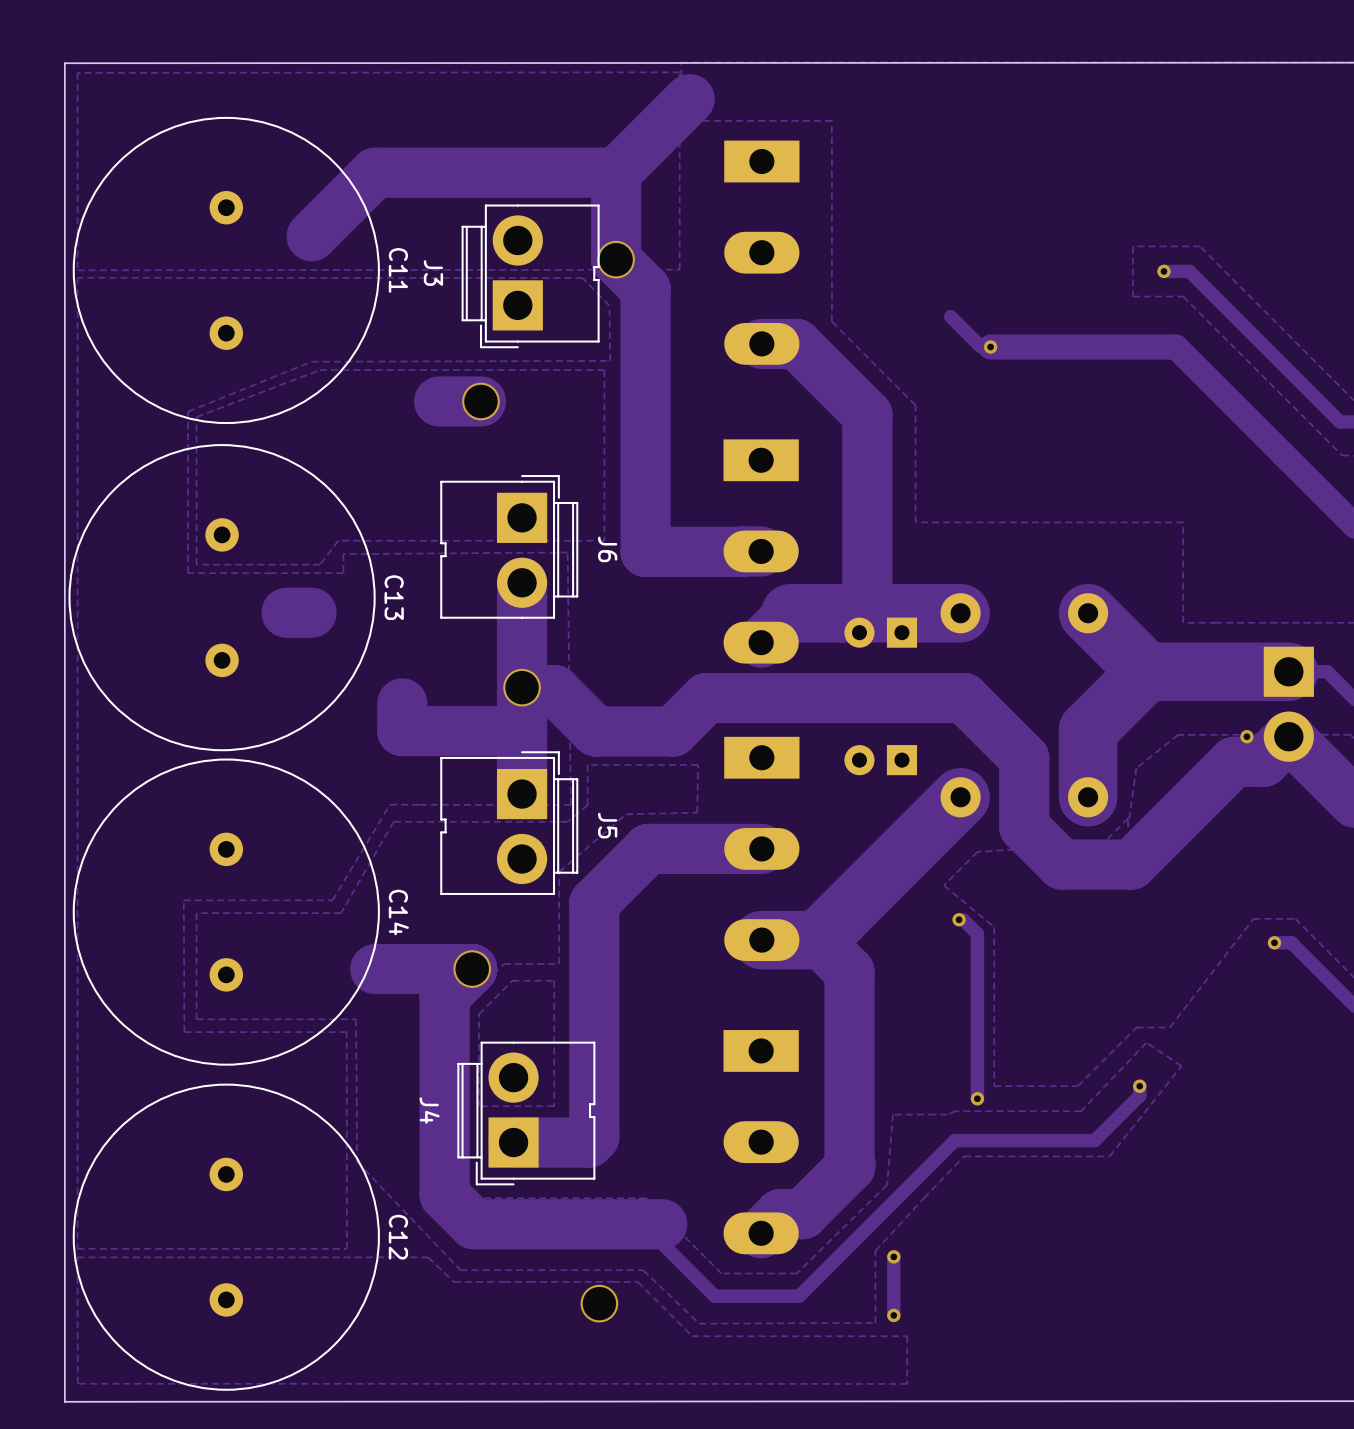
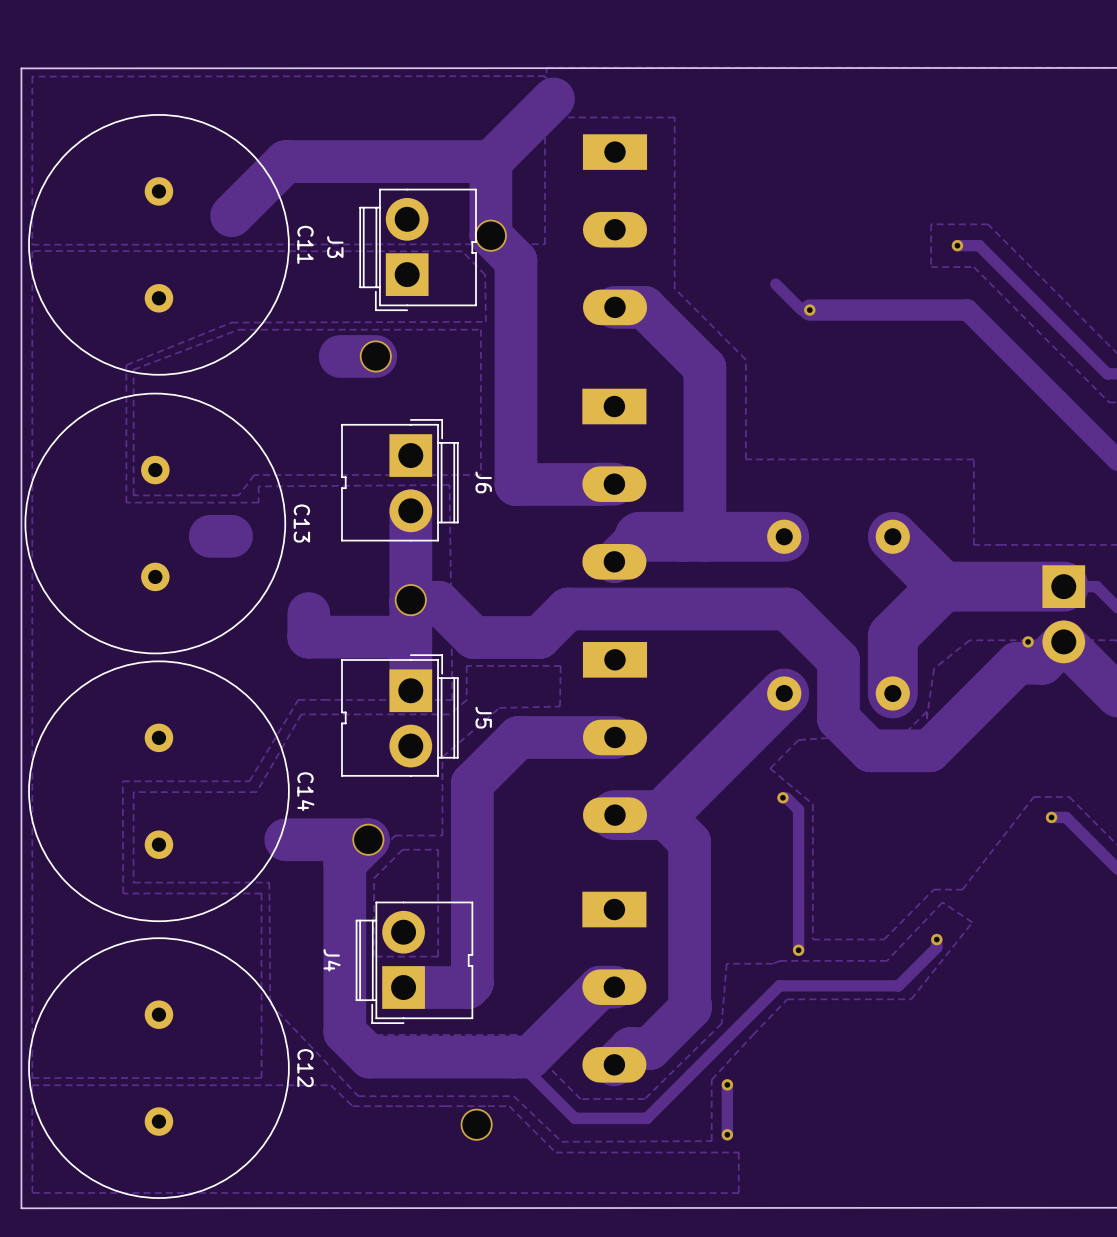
part: (880, 632) -> none
part: (880, 760) -> none
track: none -> (614, 987) (600, 987) (530, 1057)

